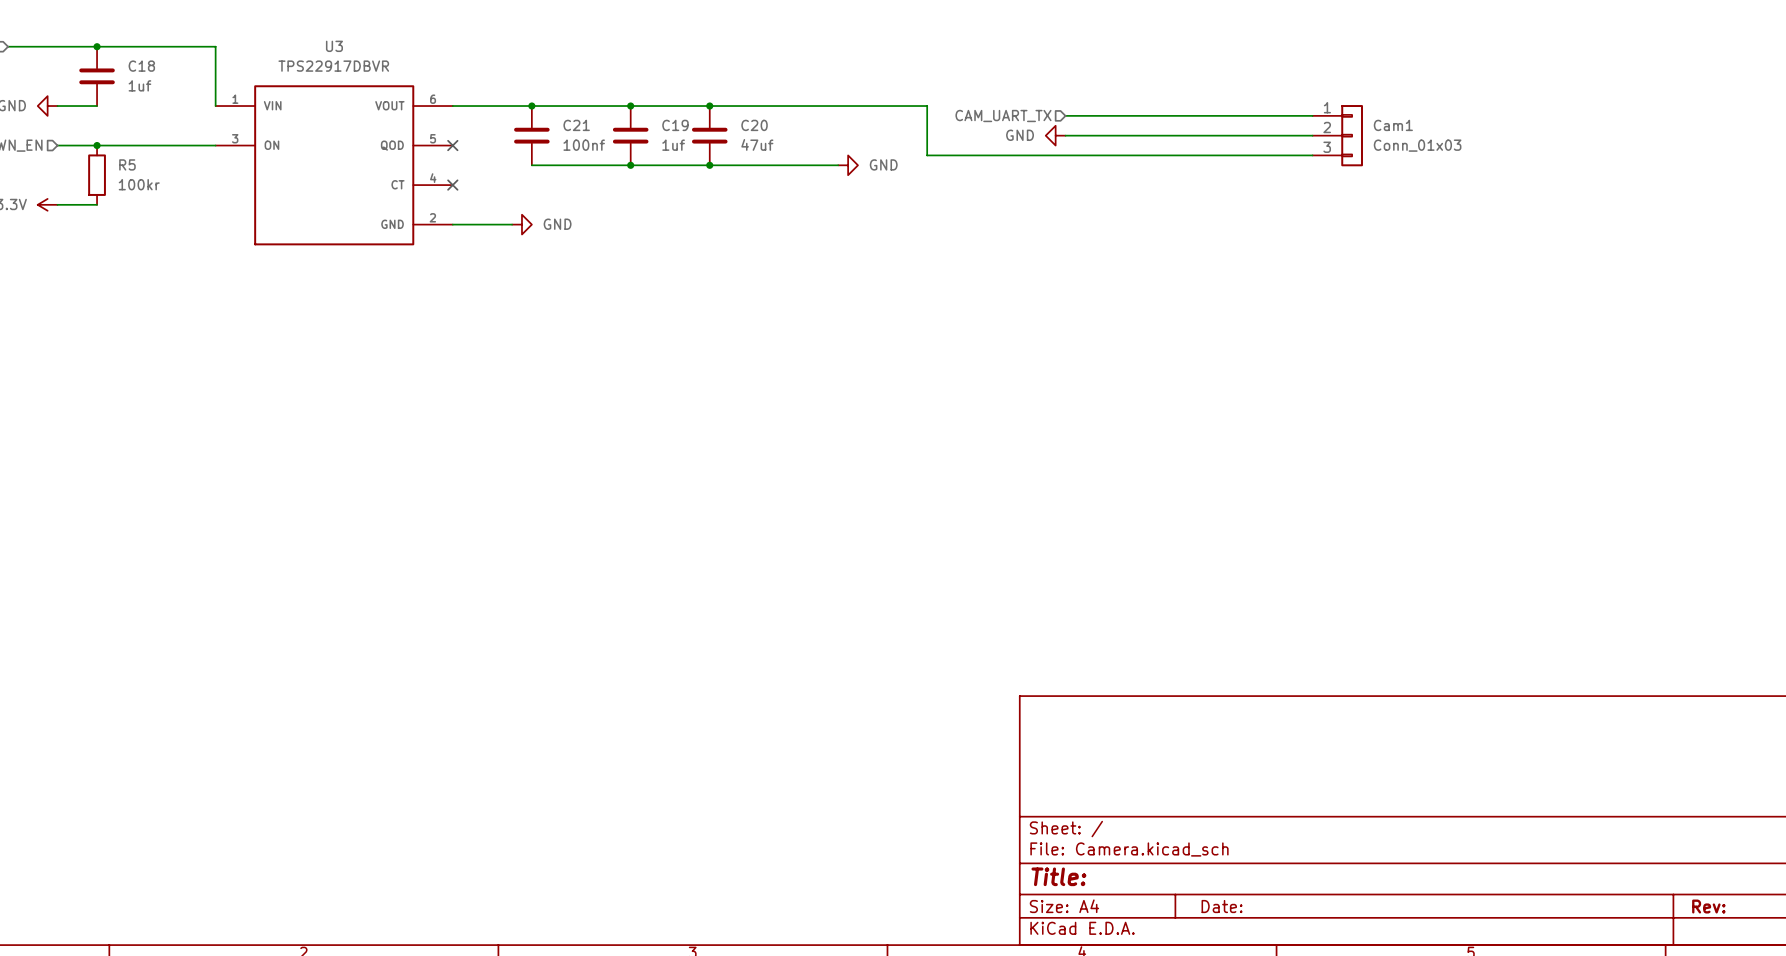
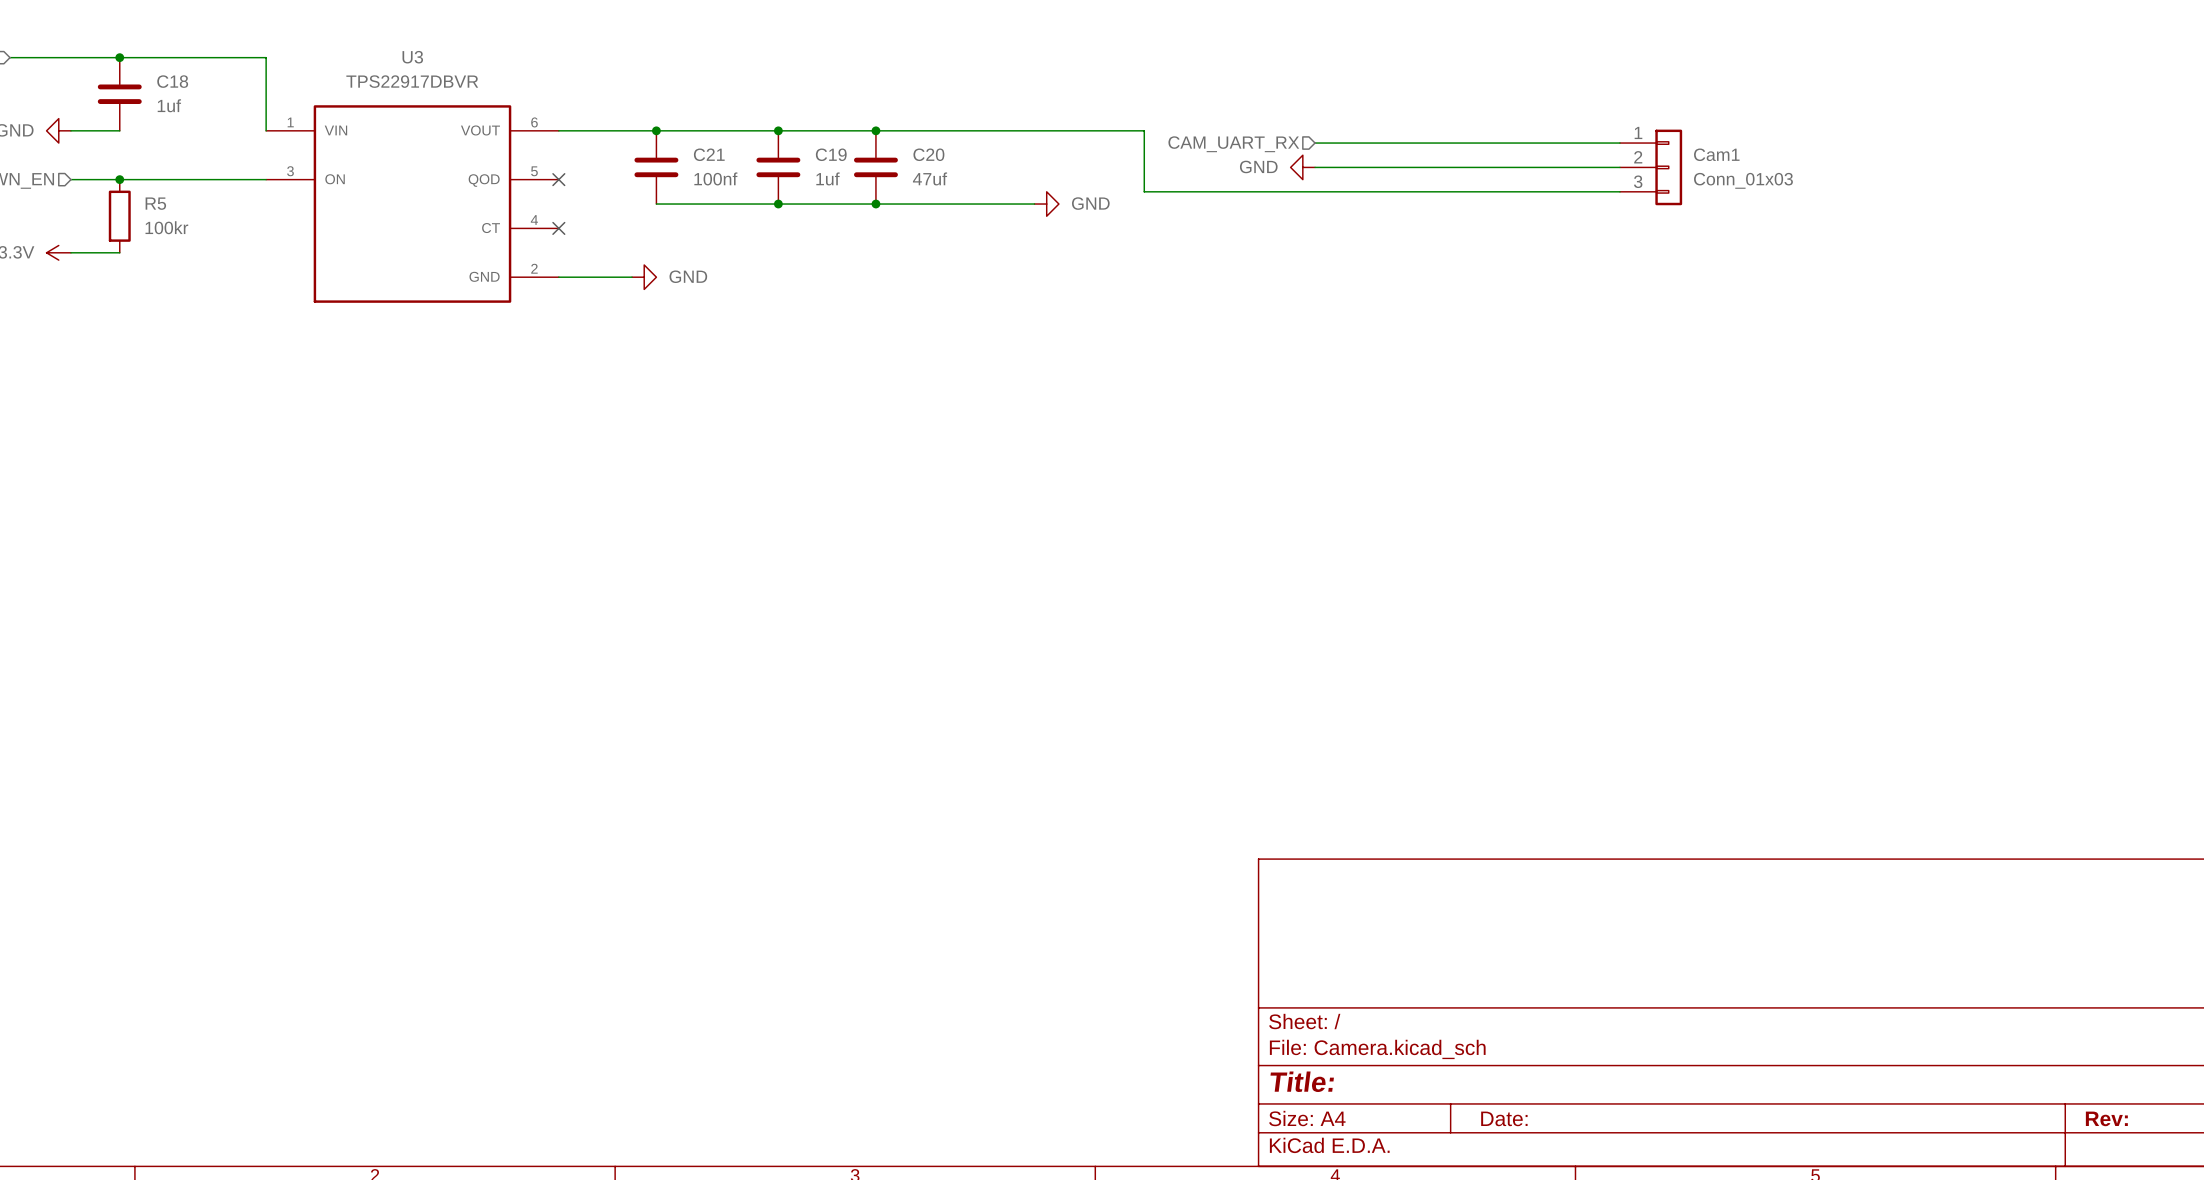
hierarchical label: CAM_UART_TX (1003, 115) -> CAM_UART_RX (1233, 144)

